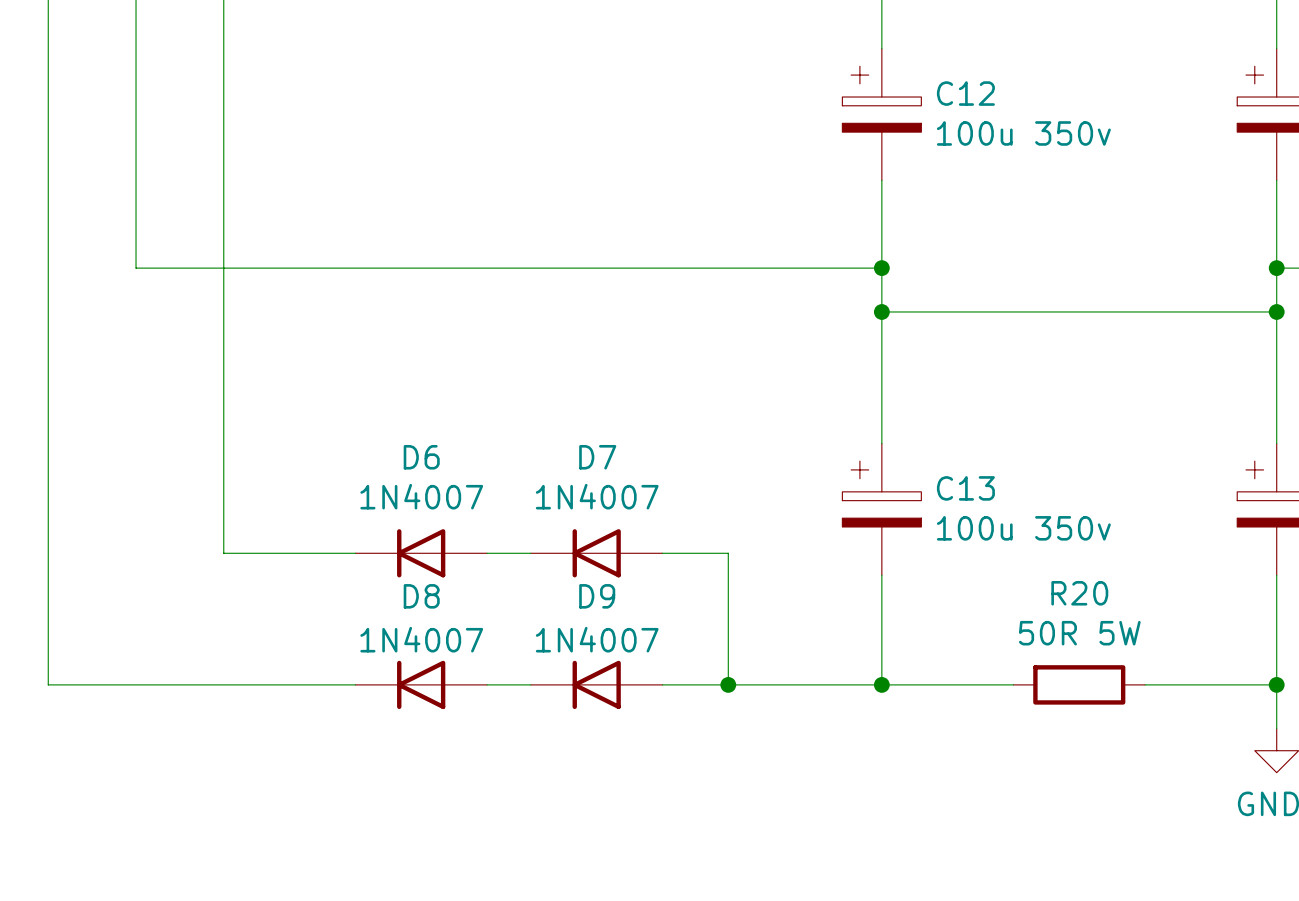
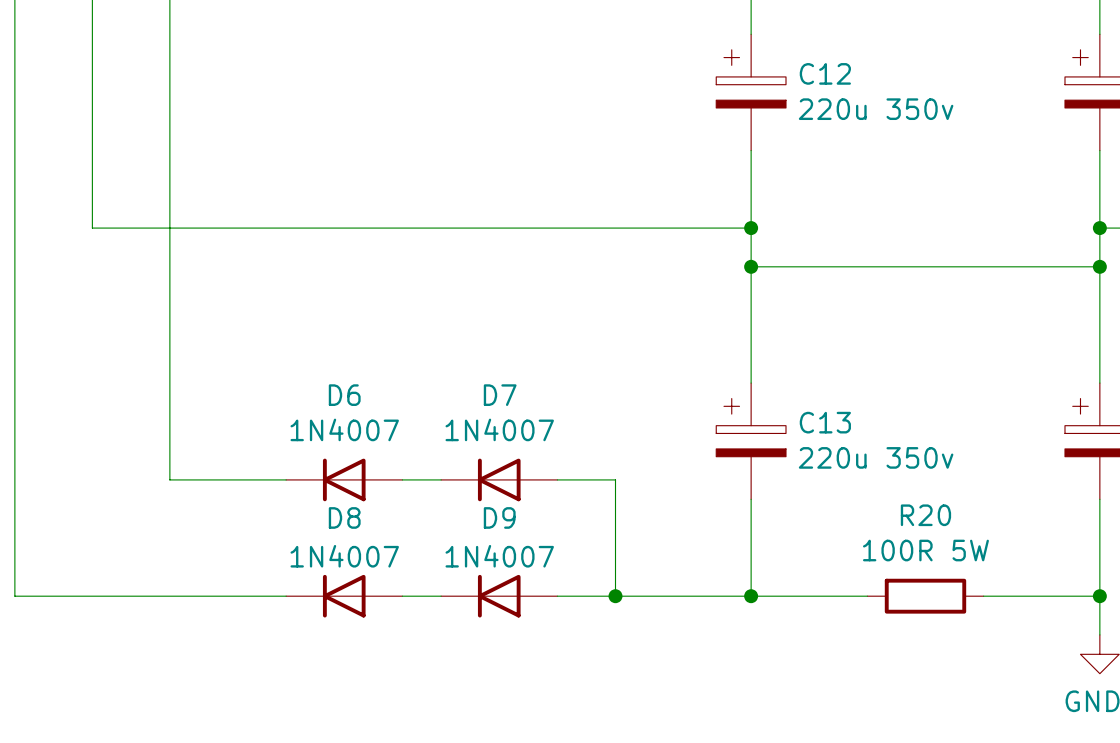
C12 value: 100u 350v (1023, 133) -> 220u 350v (876, 109)
C13 value: 100u 350v (1023, 528) -> 220u 350v (876, 457)
R20 value: 50R 5W (1079, 633) -> 100R 5W (925, 550)

